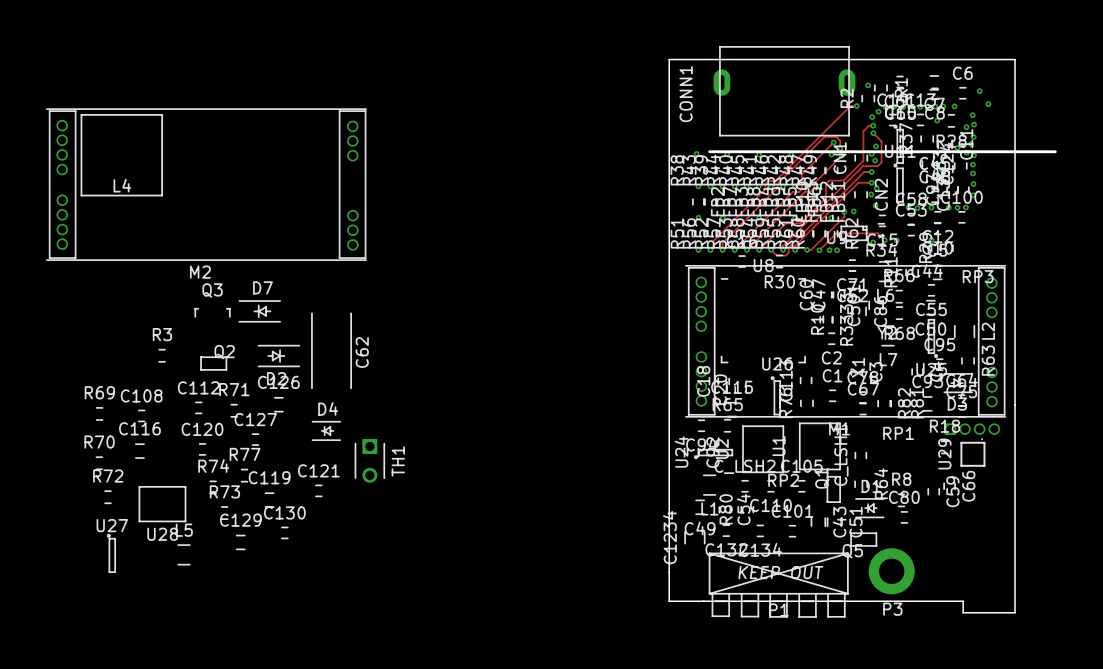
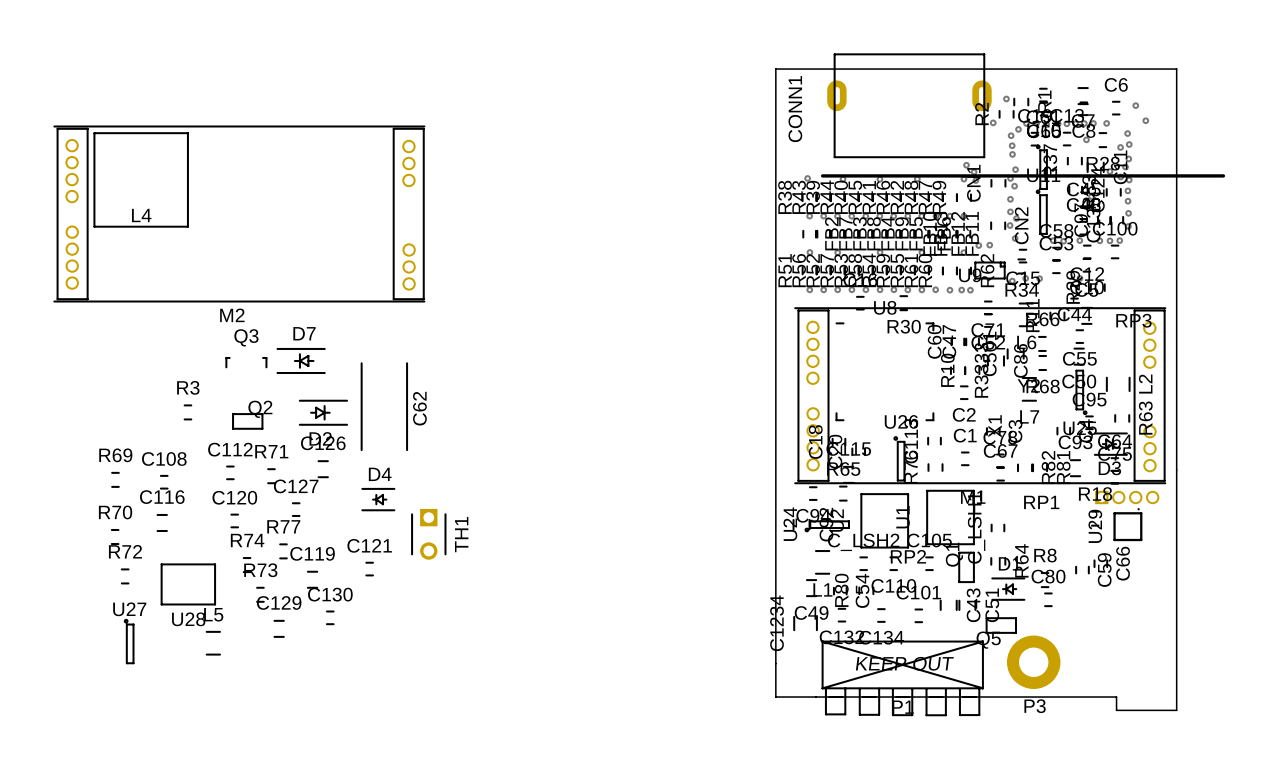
track: (856, 105) (850, 105) (775, 180) (768, 180) (765, 183) (765, 189) (713, 241) (713, 247) (710, 250) -> none
track: (873, 125) (869, 125) (863, 131) (863, 160) (843, 180) (829, 180) (826, 183) (826, 198) (800, 223) (785, 223) (759, 249) -> none
track: (873, 133) (881, 141) (881, 162) (877, 166) (862, 166) (783, 245) (783, 250) -> none
track: (833, 142) (801, 174) (801, 189) (799, 191) (792, 191) (734, 249) -> none
track: (840, 148) (840, 140) (836, 137) (824, 137) (777, 183) (777, 187) (722, 242) (722, 249) -> none
track: (841, 155) (813, 183) (813, 188) (810, 191) (804, 191) (746, 249) -> none
track: (871, 171) (864, 171) (788, 247) (788, 252) (785, 255) (776, 255) (771, 249) -> none
track: (871, 182) (858, 182) (795, 245) (795, 250) -> none
track: (844, 211) (844, 216) (811, 249) (807, 249) -> none
track: (884, 240) (877, 233) (836, 233) (819, 250) -> none

